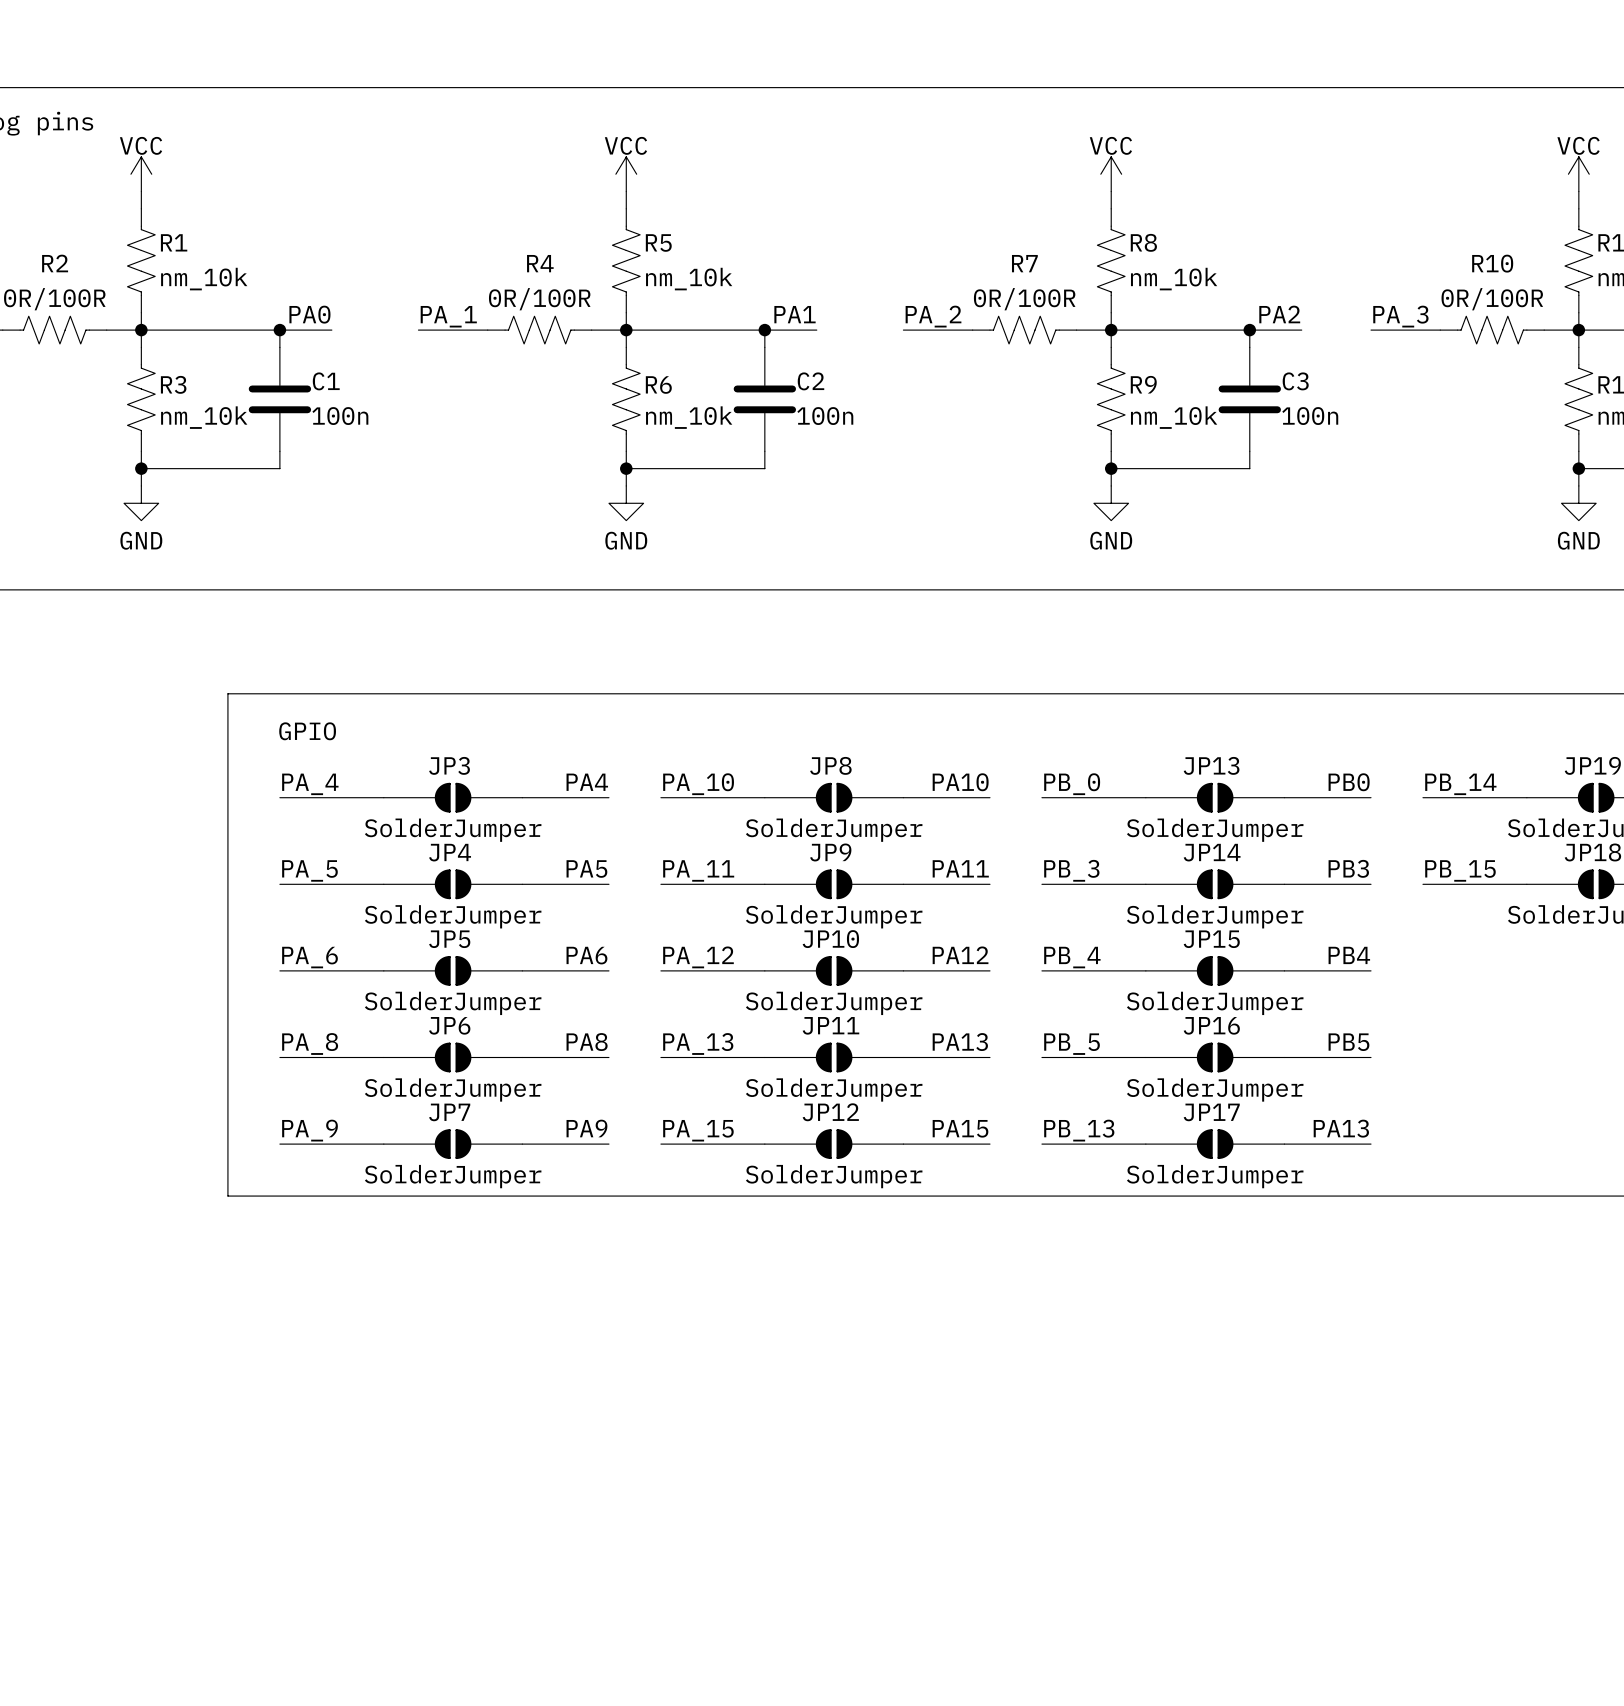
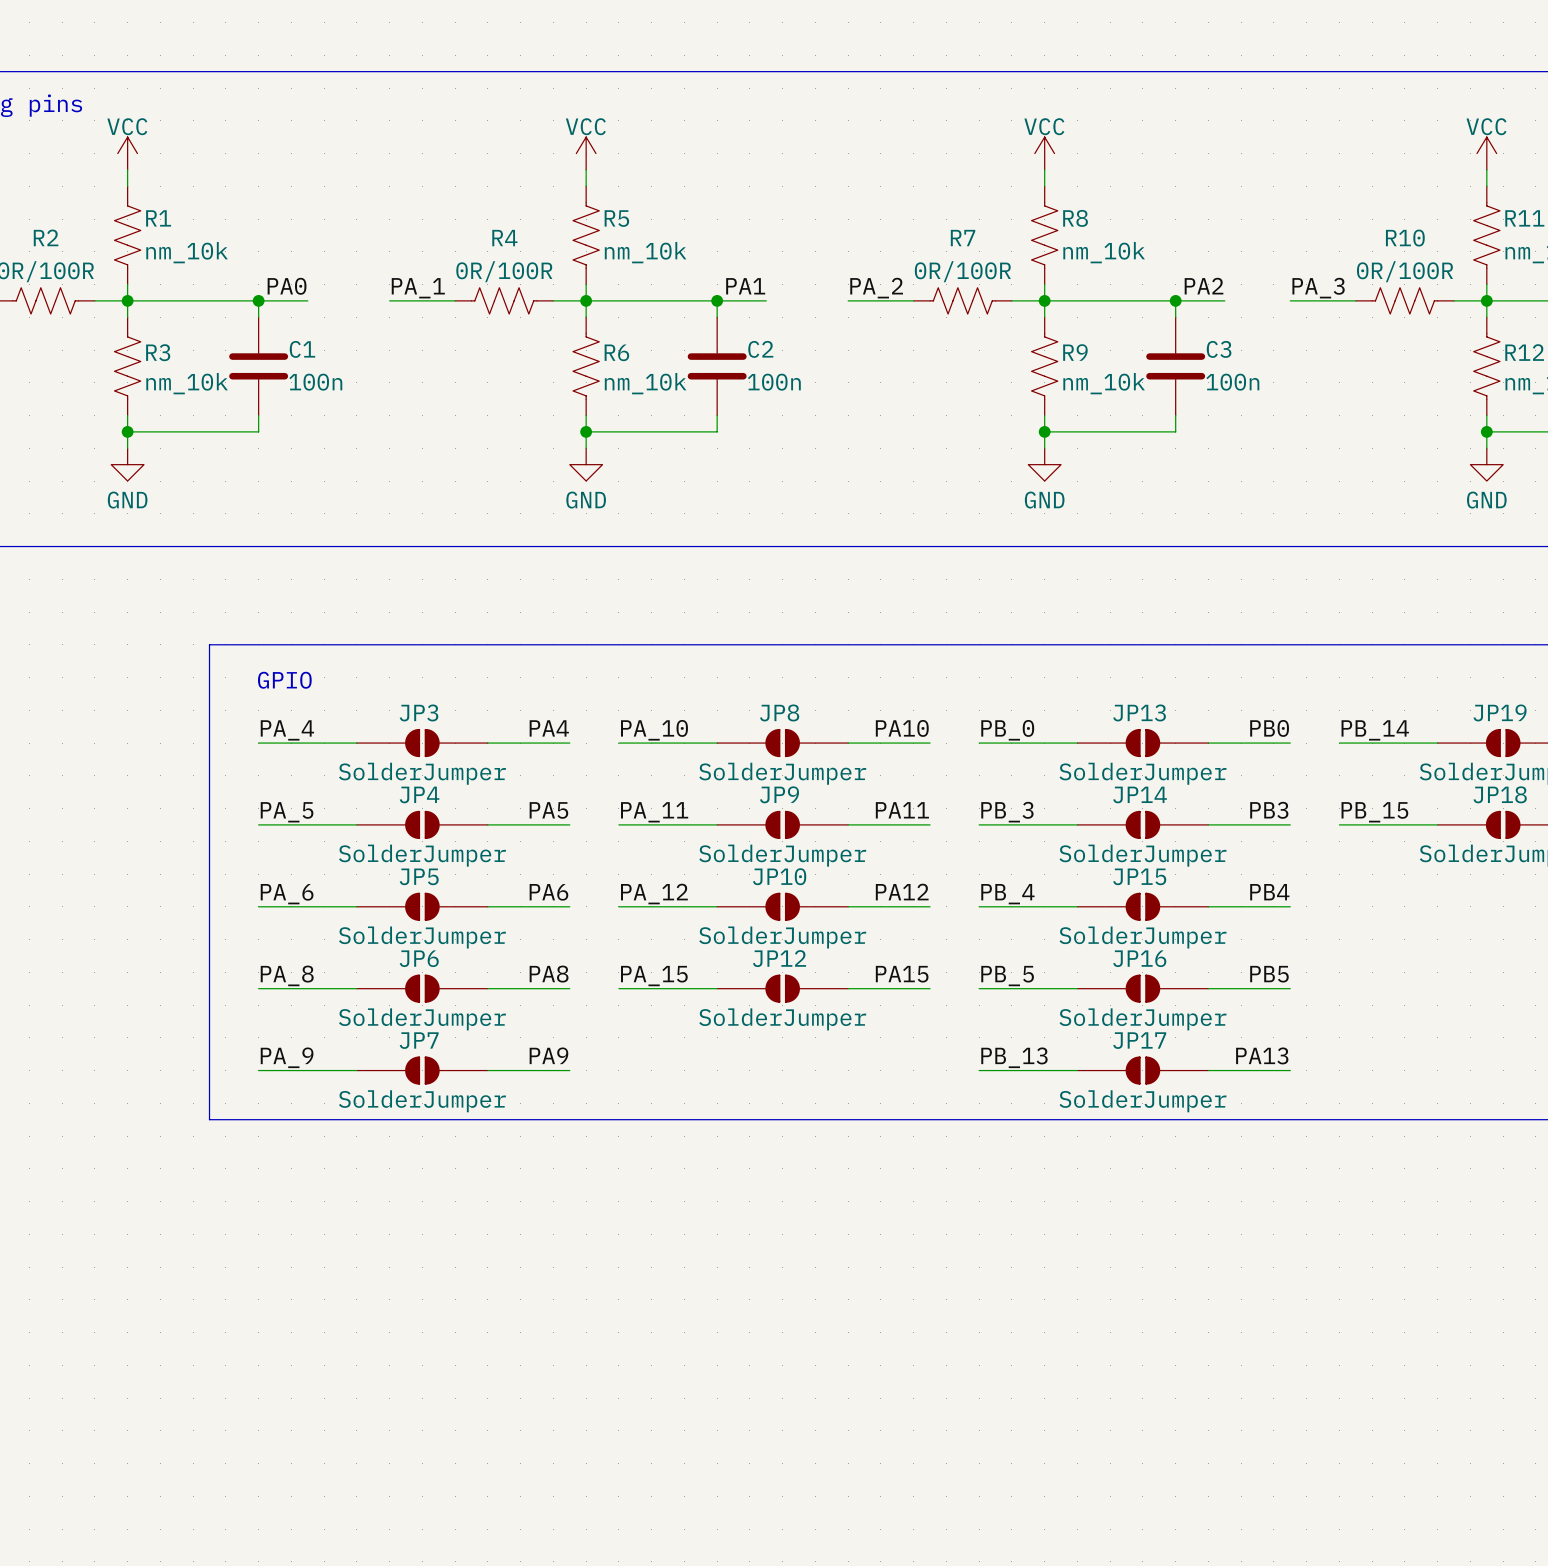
JP11 name: JP11 (830, 1025) -> JP12 (779, 958)
label: PA13 (960, 1042) -> PA15 (902, 974)
label: PA_13 (698, 1043) -> PA_15 (654, 976)
label: PA15 (960, 1128) -> none
label: PA_15 (698, 1130) -> none
wire: (660, 1144) (764, 1144) -> none
JP12: SolderJumper (834, 1144) -> none
wire: (903, 1144) (989, 1144) -> none

